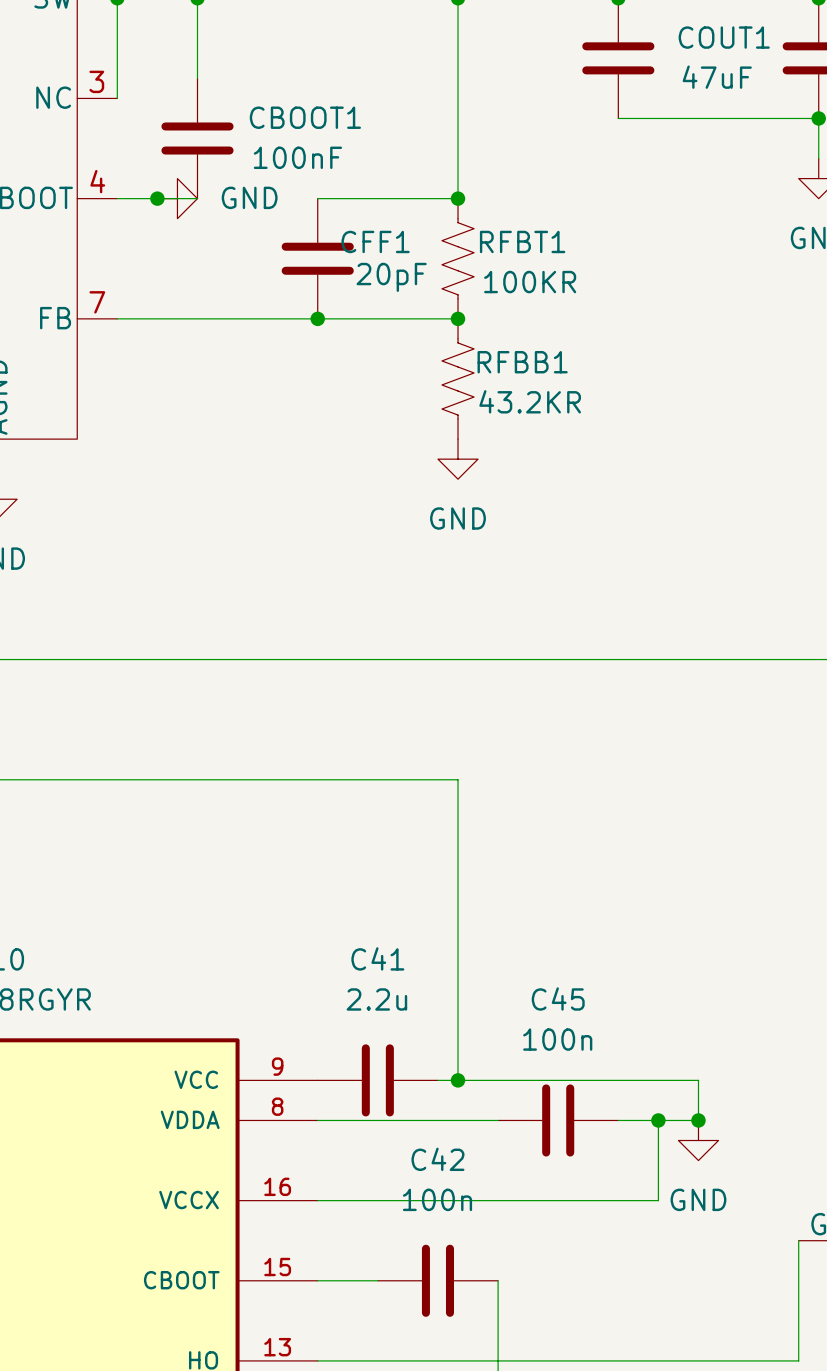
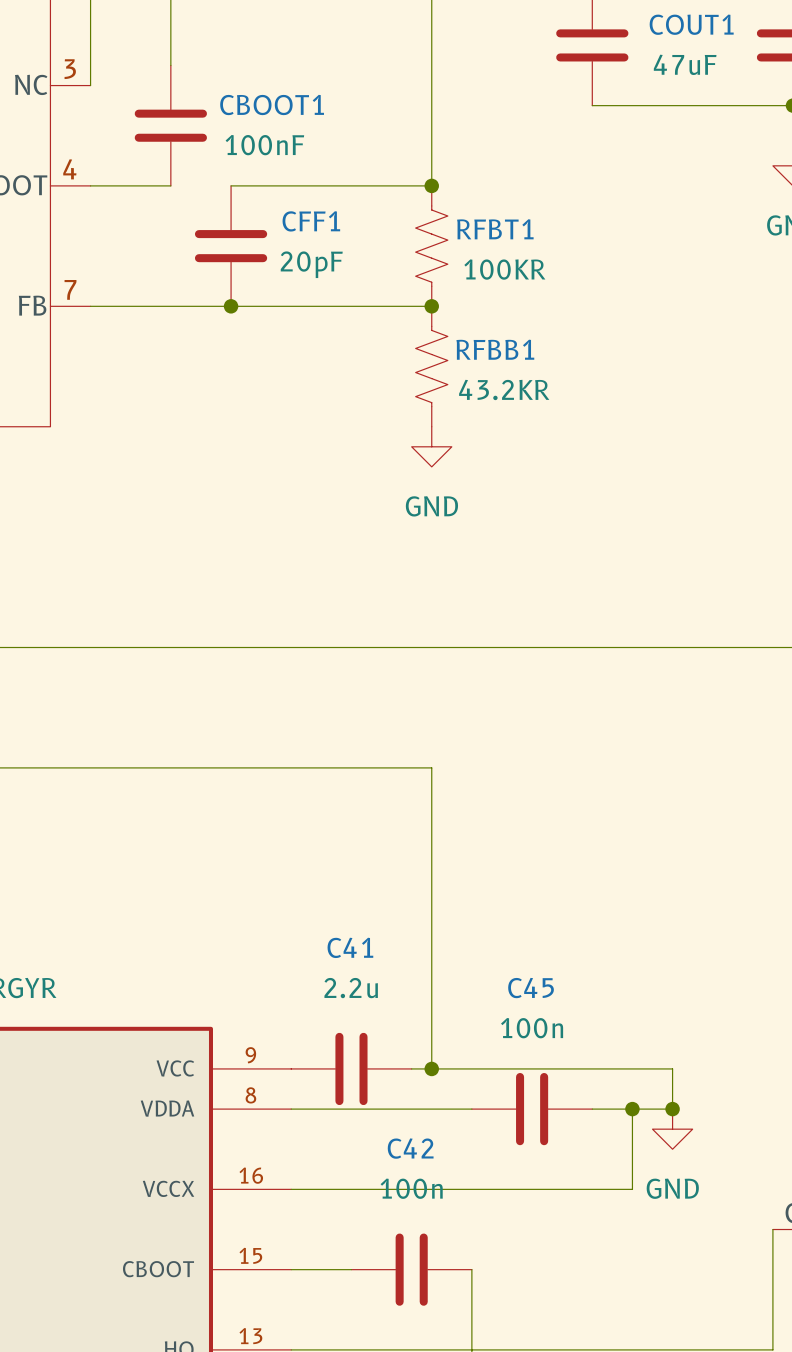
junction: (157, 198) -> none
power symbol: GND (177, 198) -> none
wire: none -> (231, 185) (291, 185)
CFF1 name position: CFF1 (375, 241) -> CFF1 (311, 221)
CFF1 position: (317, 258) -> (231, 246)
junction position: (317, 318) -> (231, 306)

